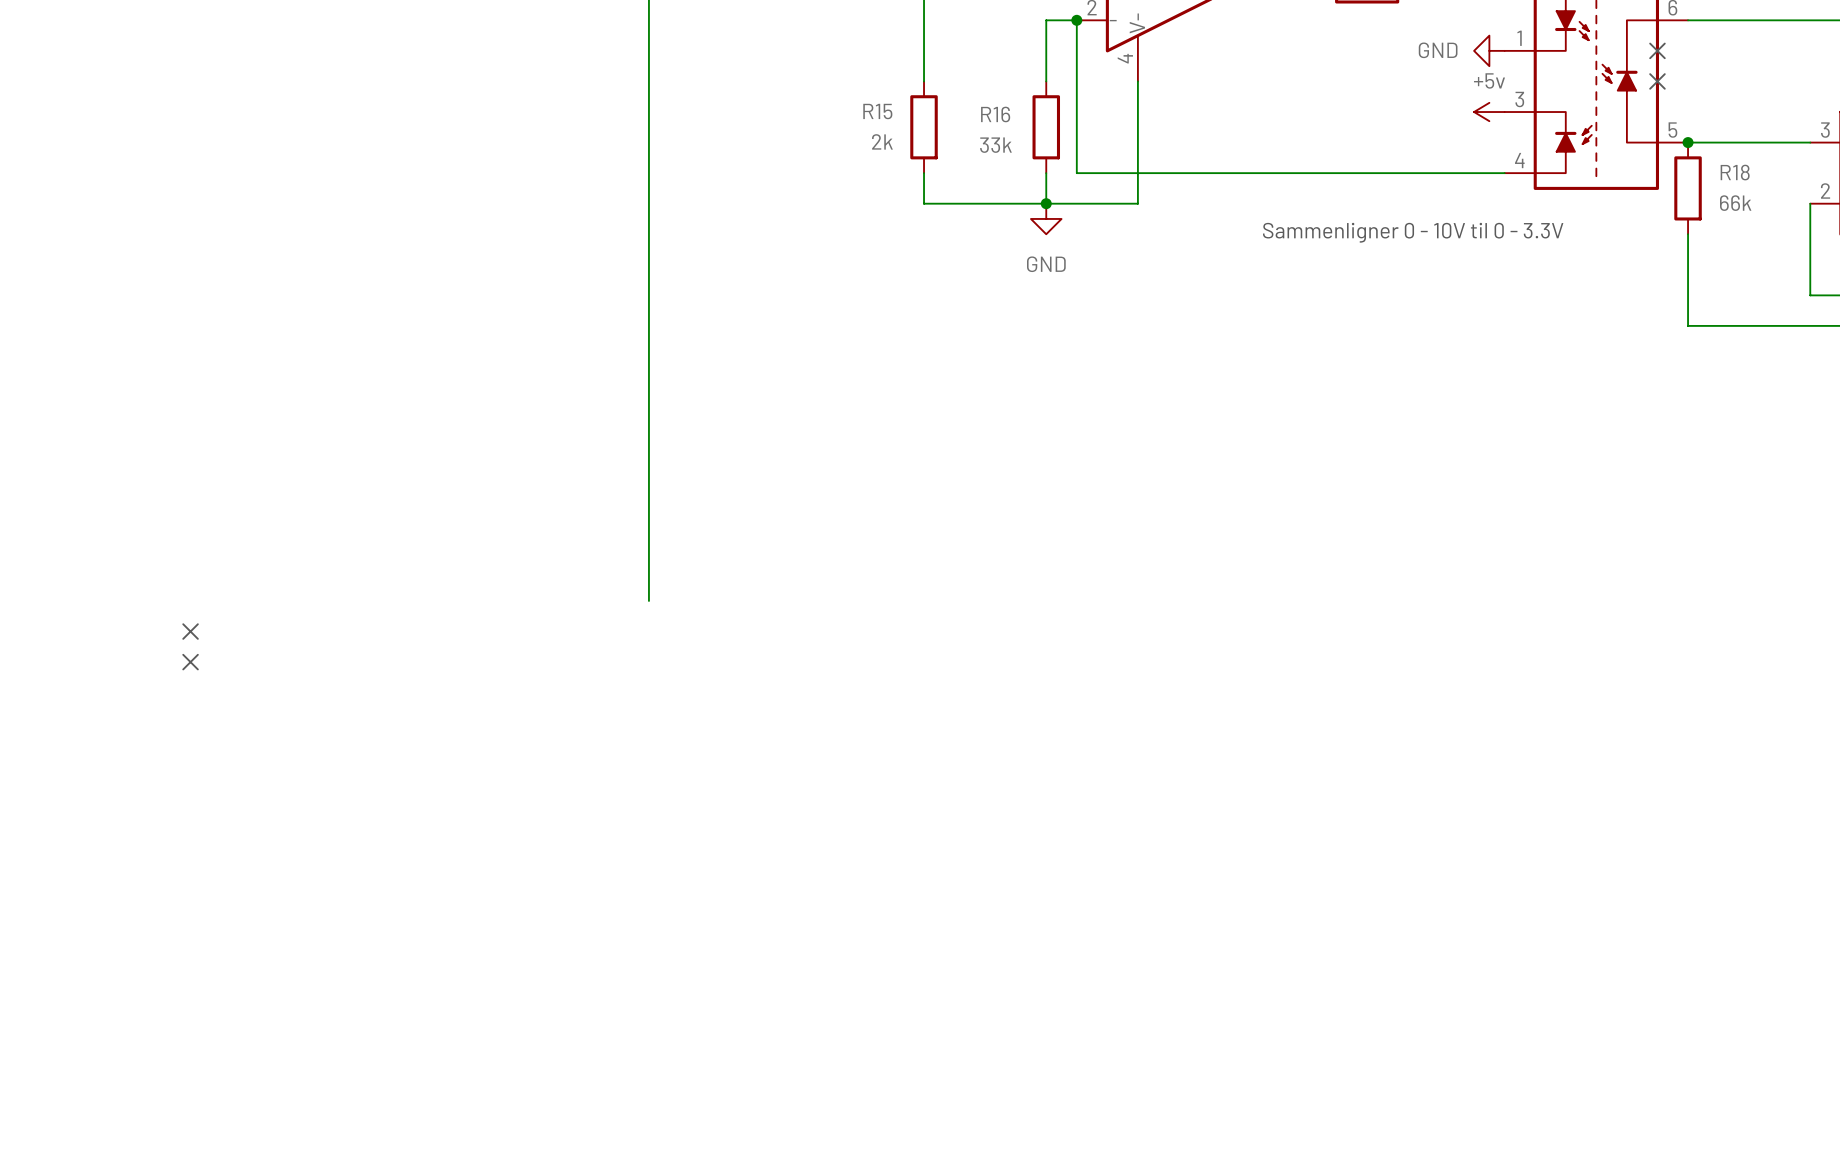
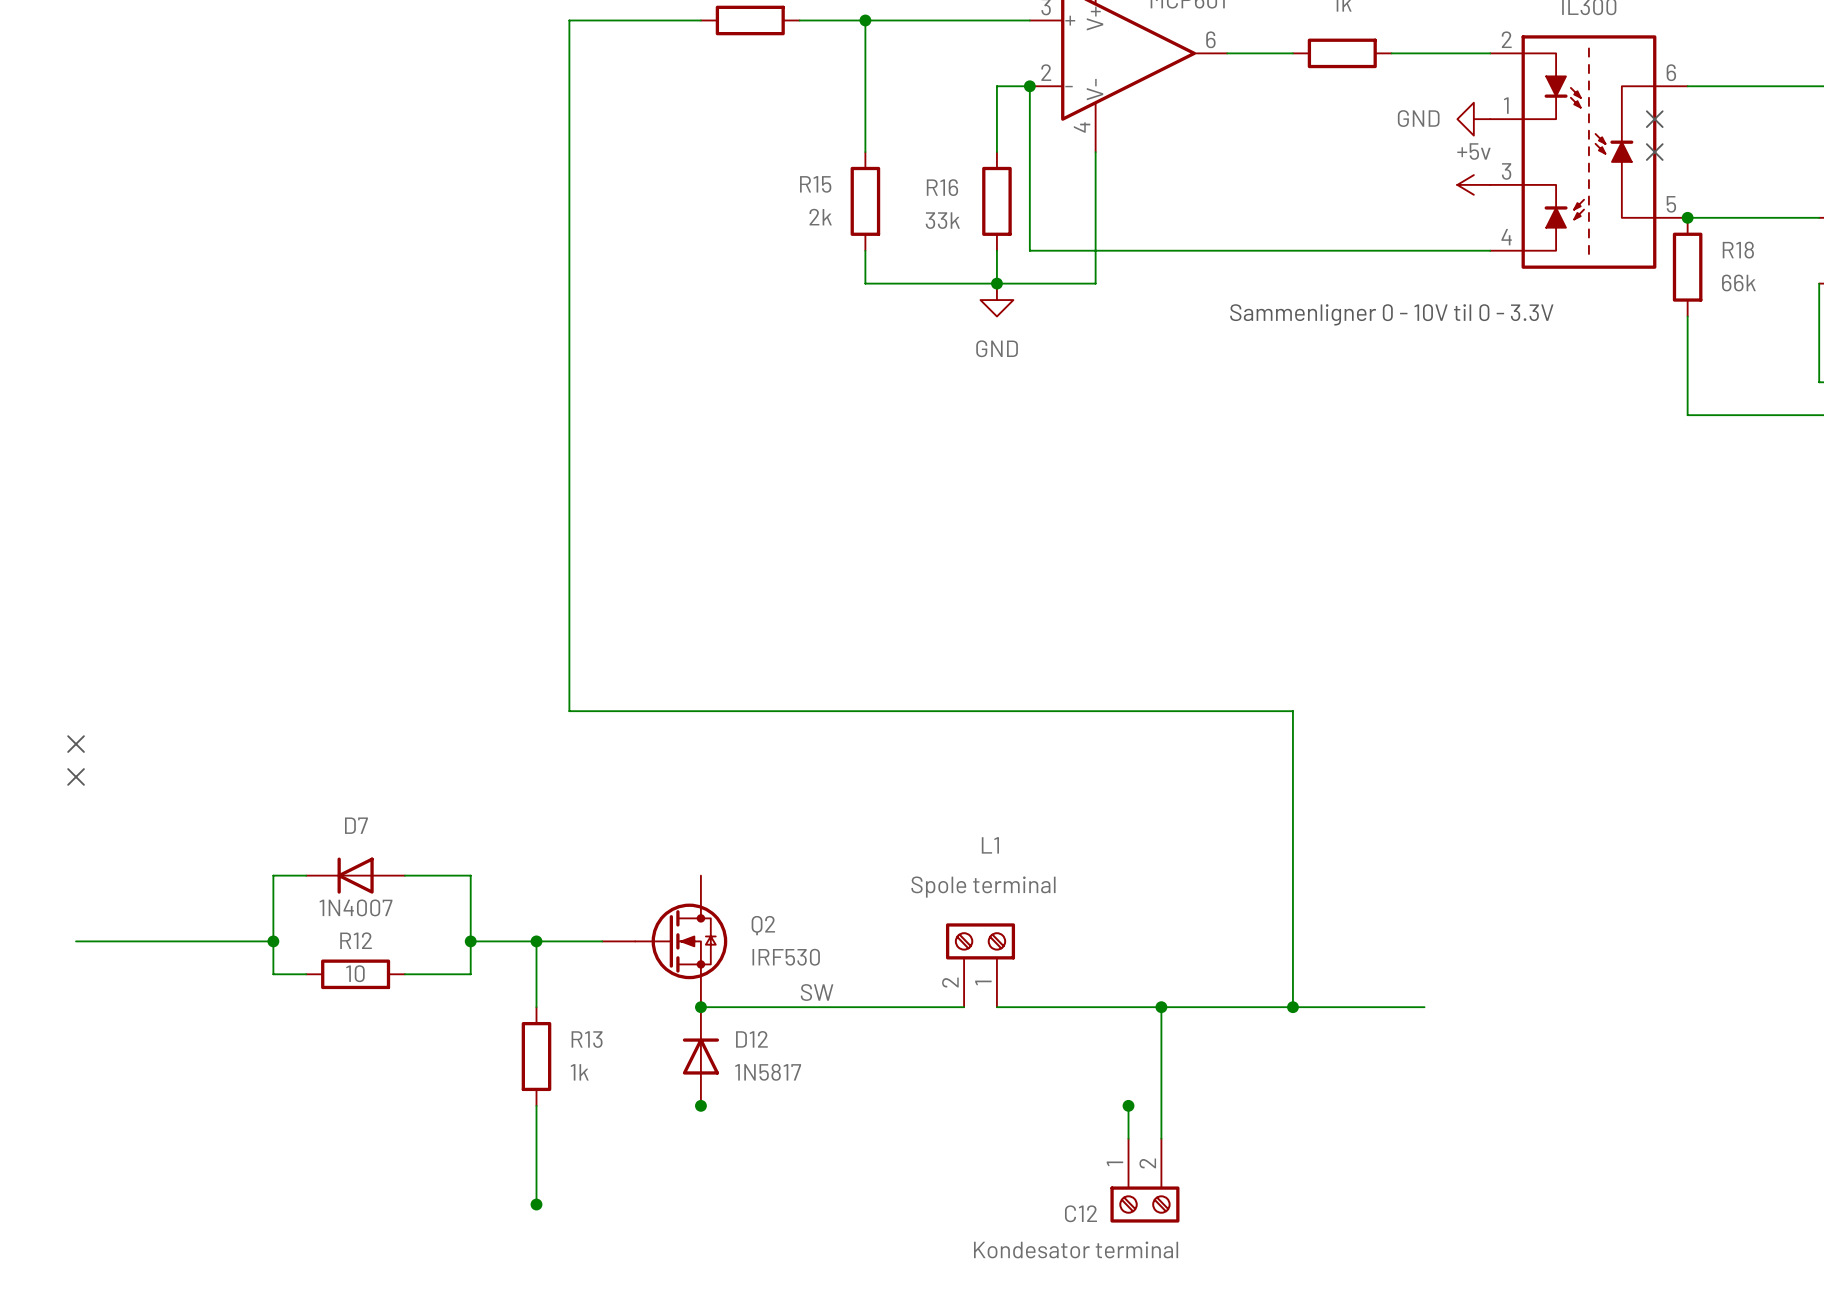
wire: none -> (569, 711) (1292, 711) (1292, 1007)
wire: none -> (306, 875) (273, 875) (273, 974) (306, 974)
D7: none -> 1N4007 (355, 875)
wire: none -> (404, 875) (470, 875) (470, 974) (404, 974)
wire: none -> (76, 941) (273, 941)
junction: none -> (273, 941)
wire: none -> (470, 941) (602, 941)
junction: none -> (470, 941)
wire: none -> (536, 941) (536, 1007)
junction: none -> (536, 941)
Q2: none -> IRF530 (664, 941)
L1: none -> Spole terminal (980, 965)
R12: none -> 10 (355, 974)
label: none -> SW (817, 992)
wire: none -> (700, 1007) (964, 1007)
junction: none -> (700, 1007)
wire: none -> (996, 1007) (1424, 1007)
wire: none -> (1161, 1007) (1161, 1138)
junction: none -> (1161, 1007)
junction: none -> (1292, 1007)
R13: none -> 1k (536, 1056)
D12: none -> 1N5817 (700, 1056)
wire: none -> (536, 1105) (536, 1204)
junction: none -> (700, 1105)
wire: none -> (1128, 1105) (1128, 1138)
junction: none -> (1128, 1105)
C12: none -> Kondesator terminal (1144, 1180)
junction: none -> (536, 1204)

